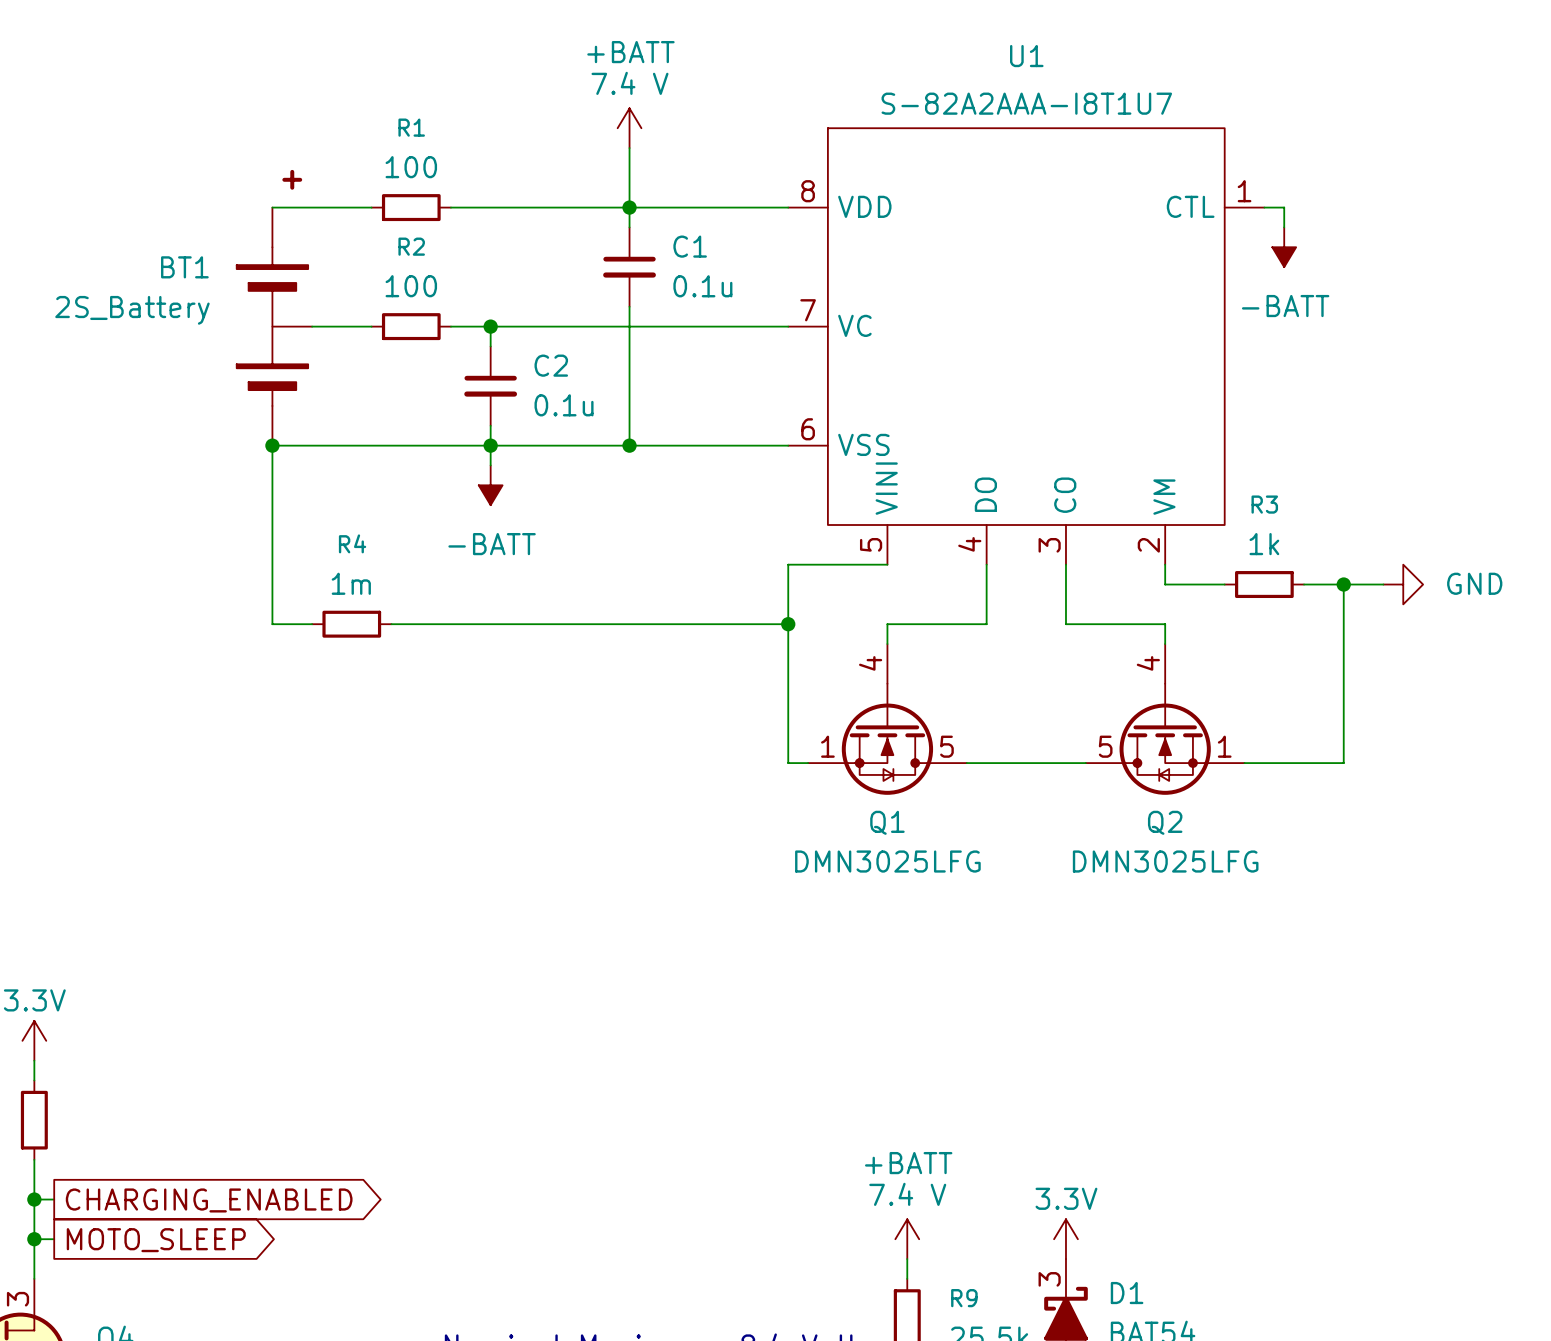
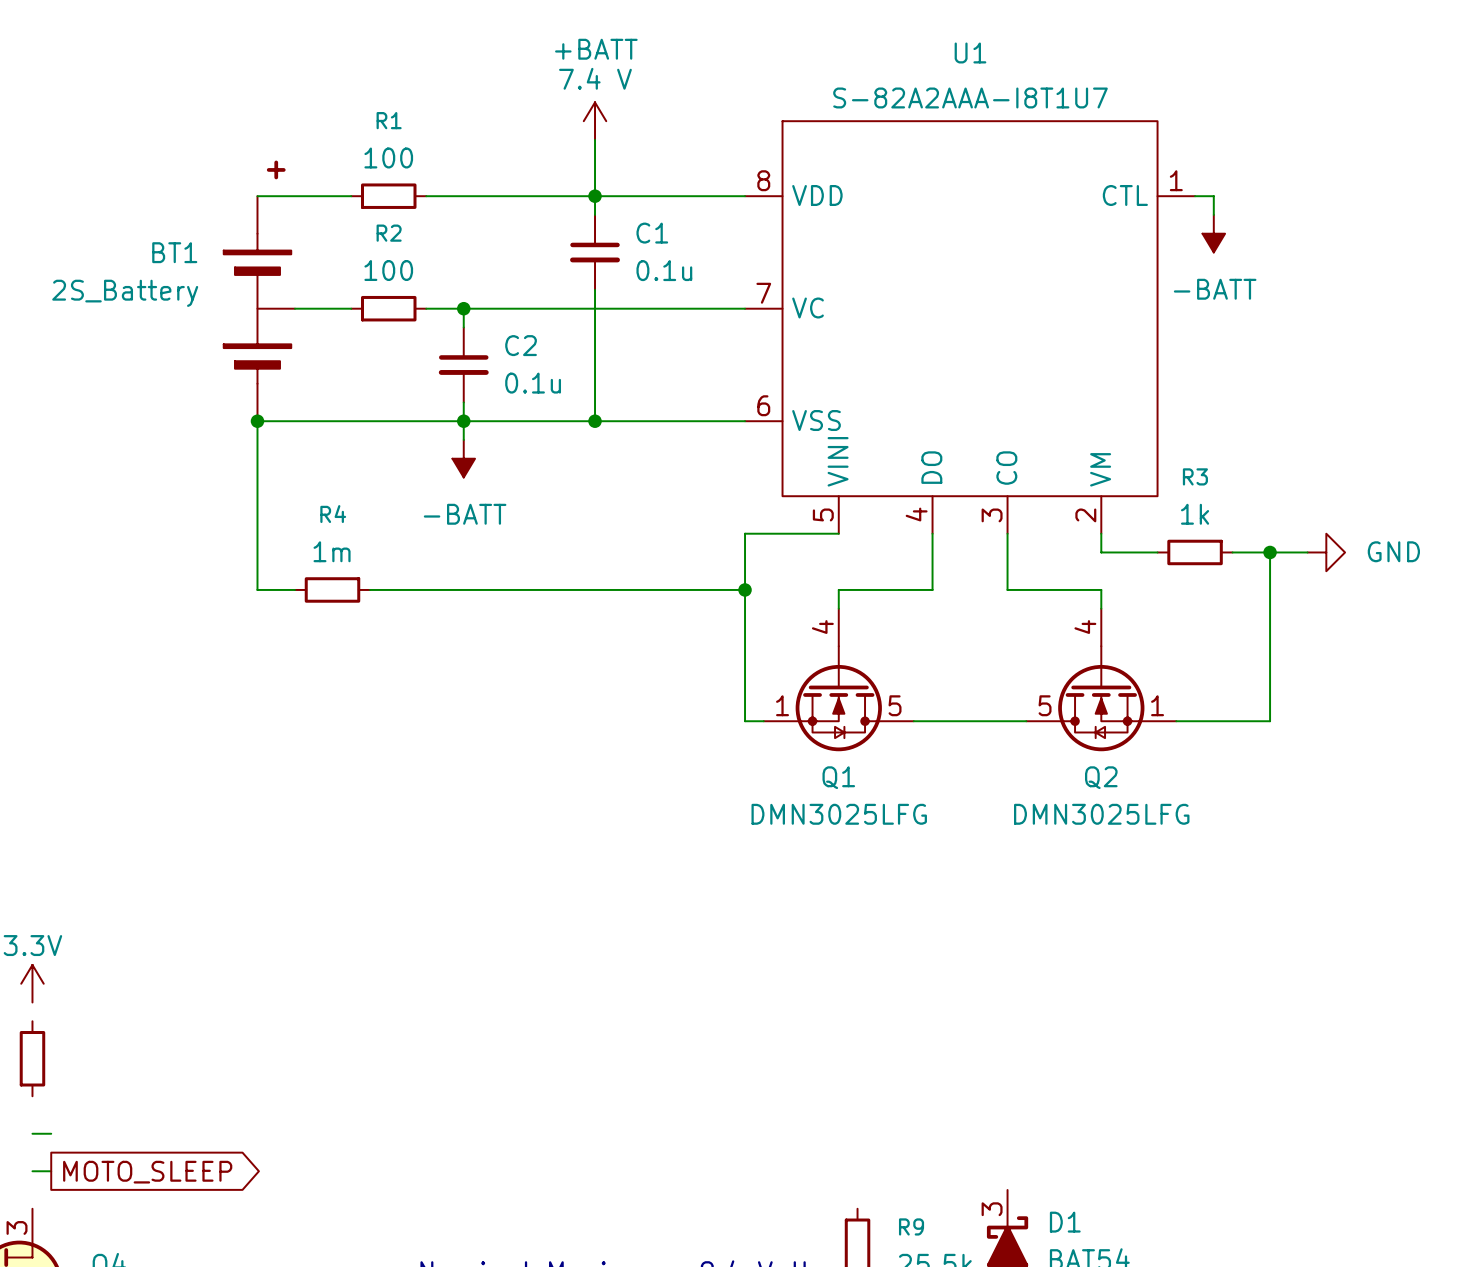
wire: (34, 1060) (34, 1080) -> none
wire: (34, 1159) (34, 1278) -> none
junction: (34, 1199) -> none
global label: CHARGING_ENABLED (209, 1200) -> none
junction: (34, 1239) -> none
power symbol: +BATT (907, 1239) -> none
power symbol: 3.3V (1065, 1239) -> none
wire: (907, 1259) (907, 1278) -> none

